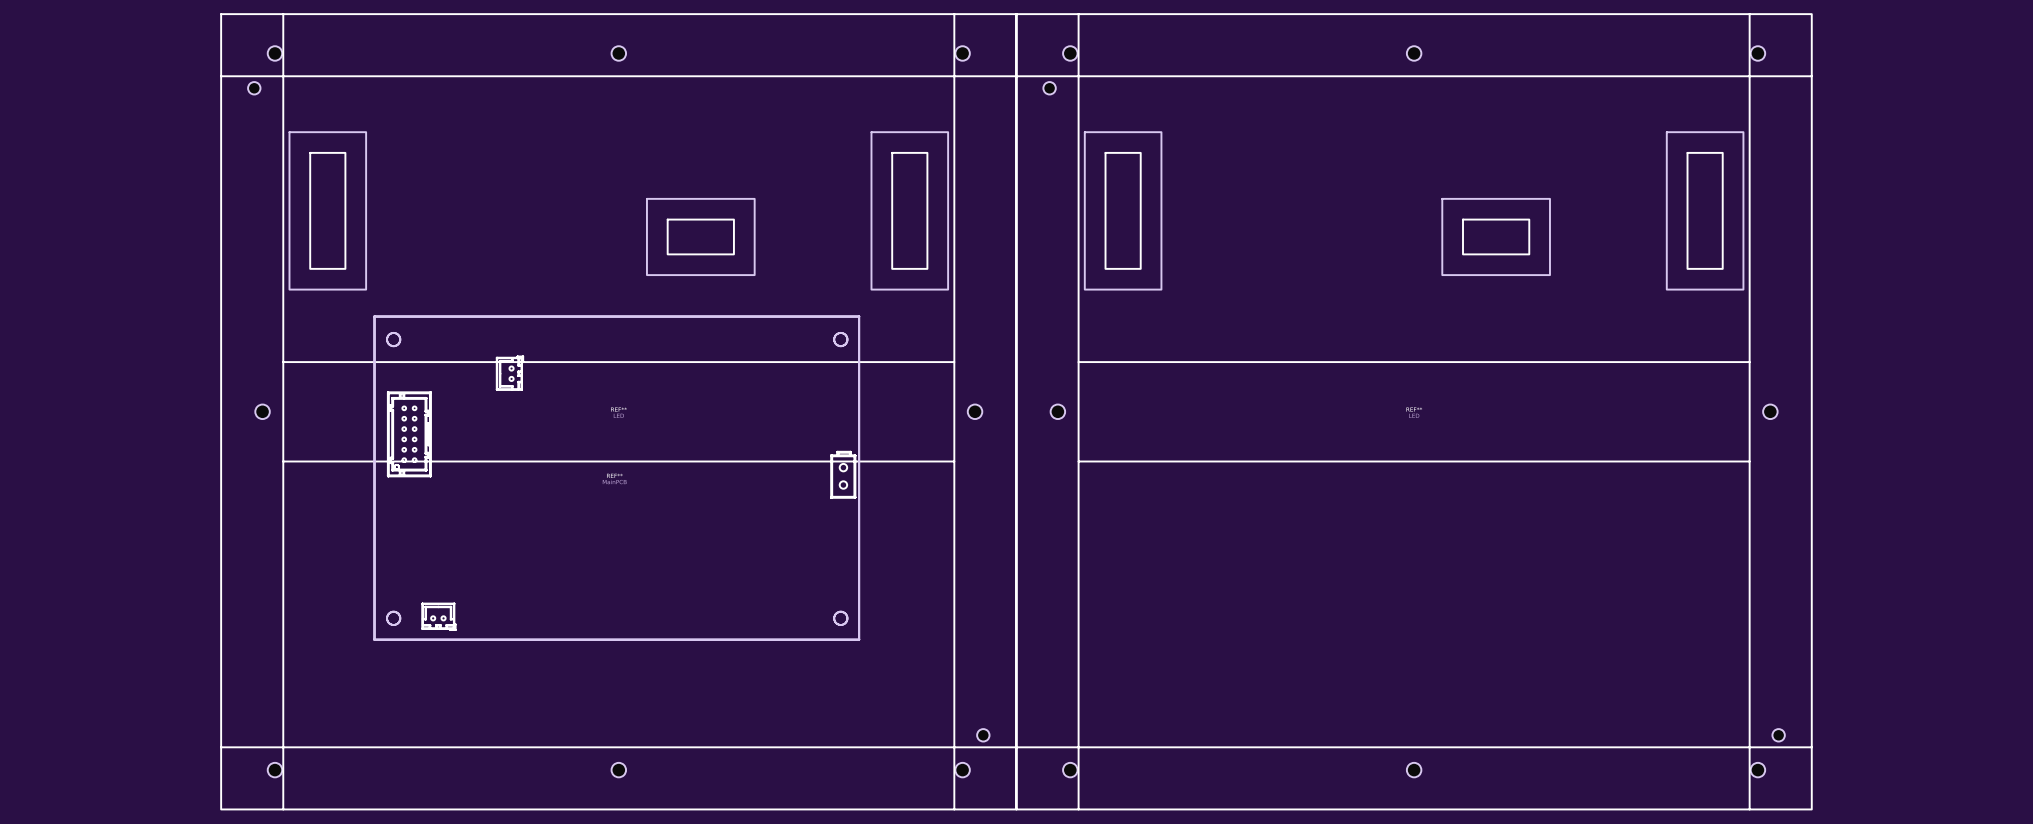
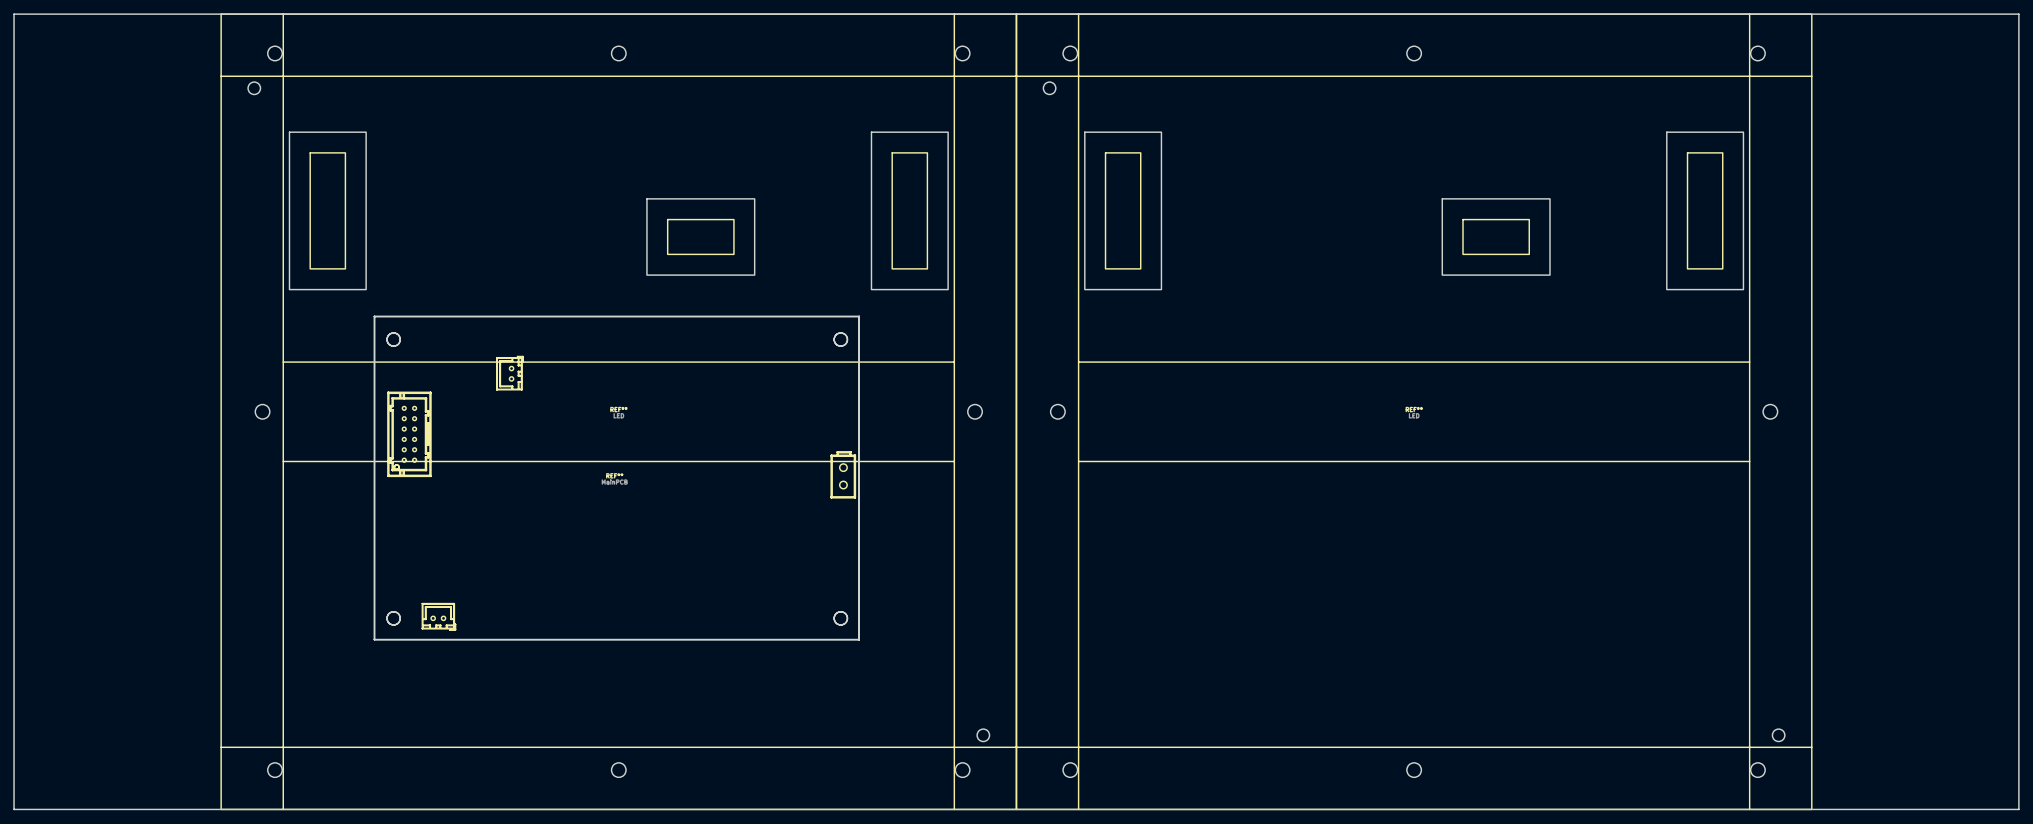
board edge: none -> (14, 14) (2018, 14) (2018, 809) (14, 809) (14, 14)

